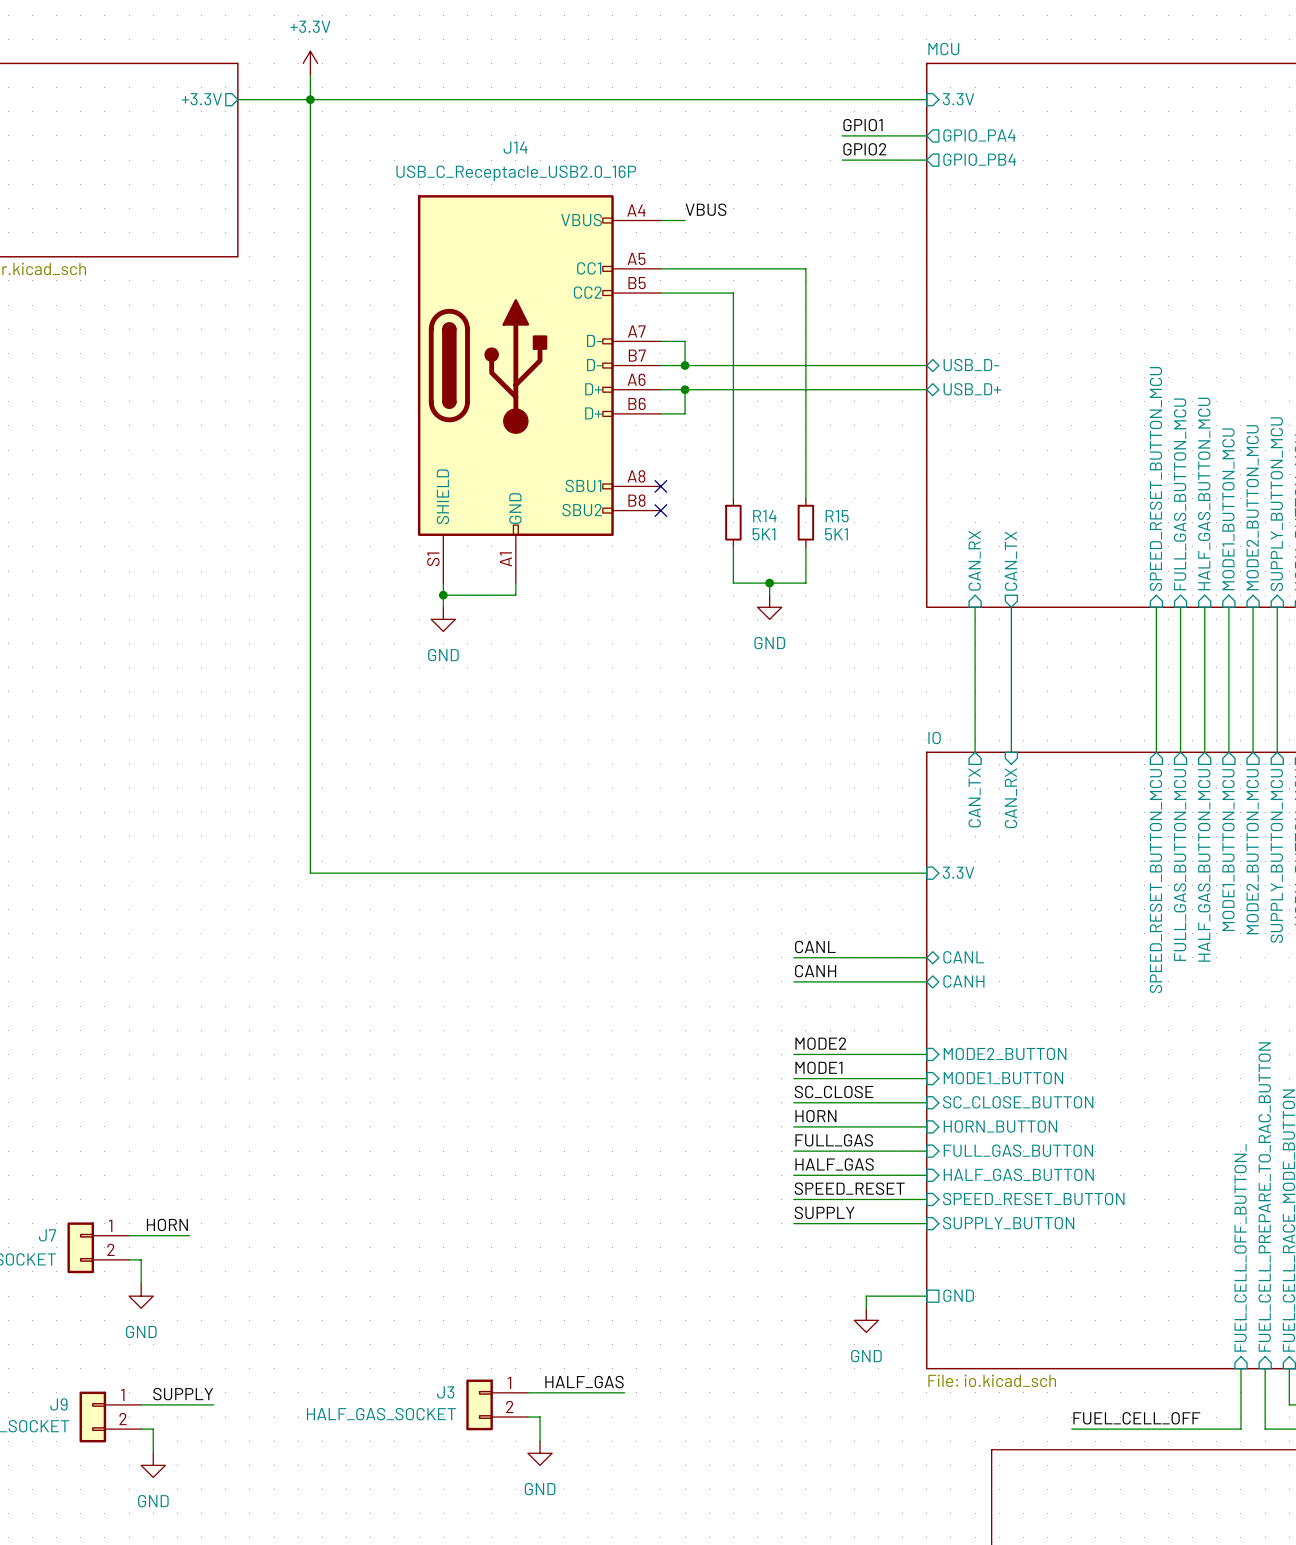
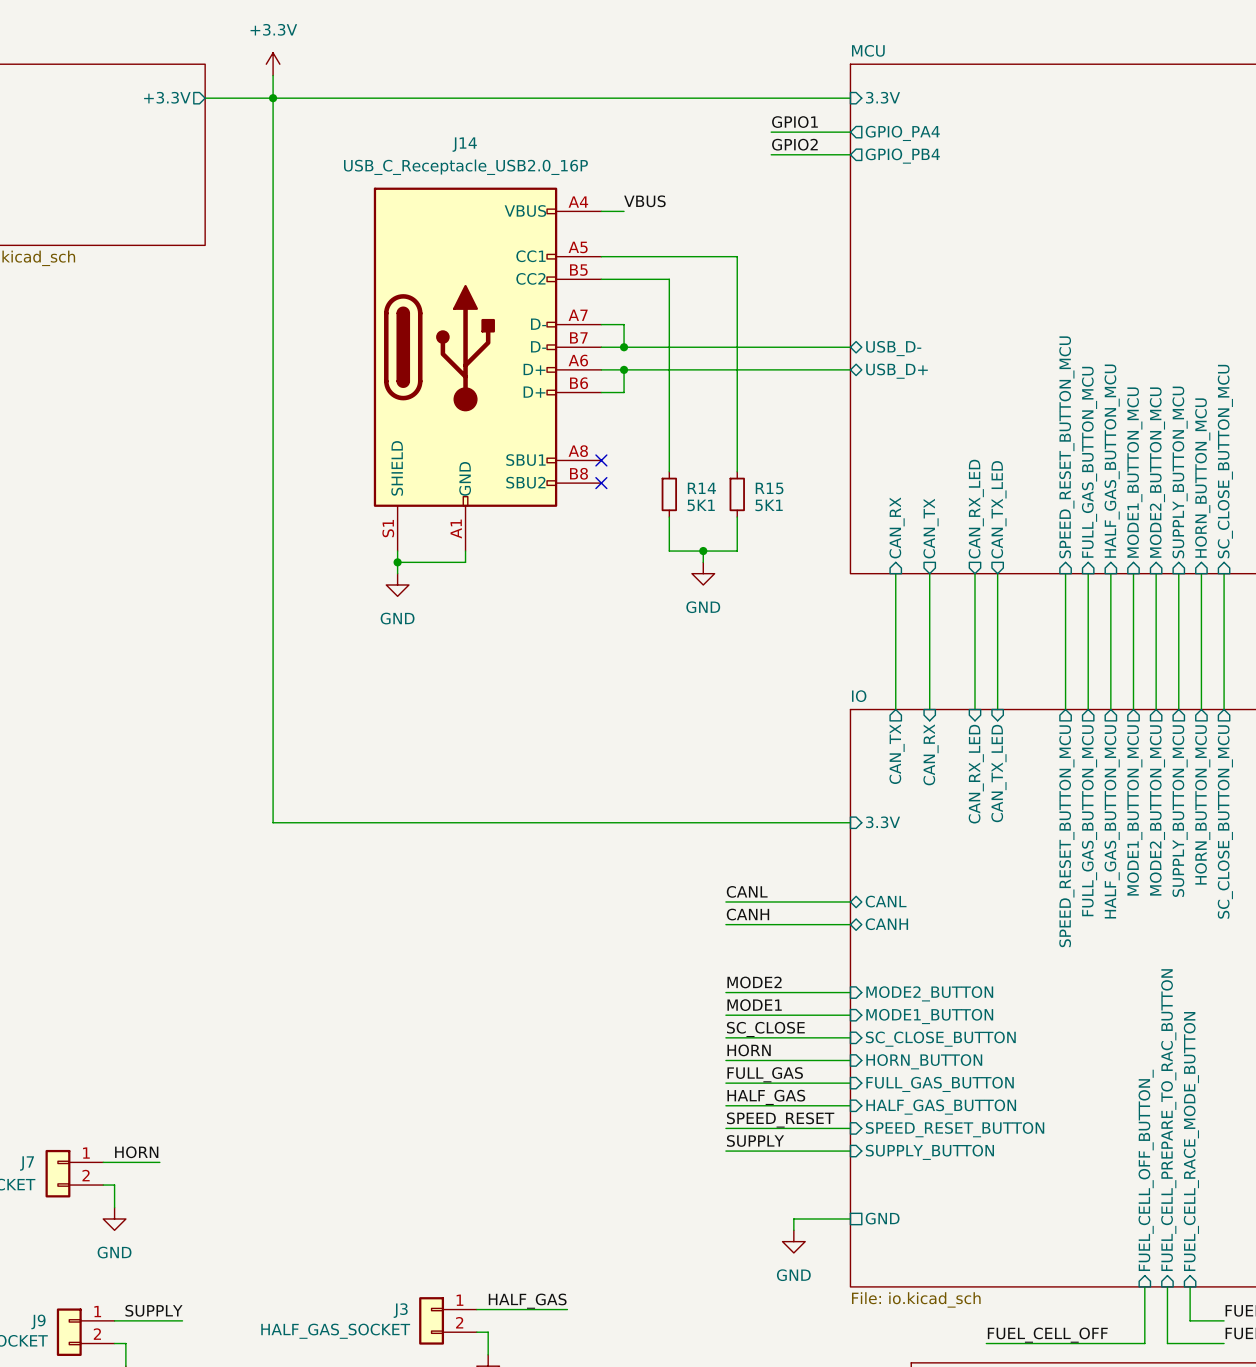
sheet pin: none -> CAN_RX_LED (976, 509)
sheet pin: none -> CAN_TX_LED (998, 509)
wire: none -> (974, 573) (974, 709)
wire: none -> (997, 573) (997, 709)
sheet pin: none -> CAN_TX_LED (998, 773)
sheet pin: none -> CAN_RX_LED (976, 774)

